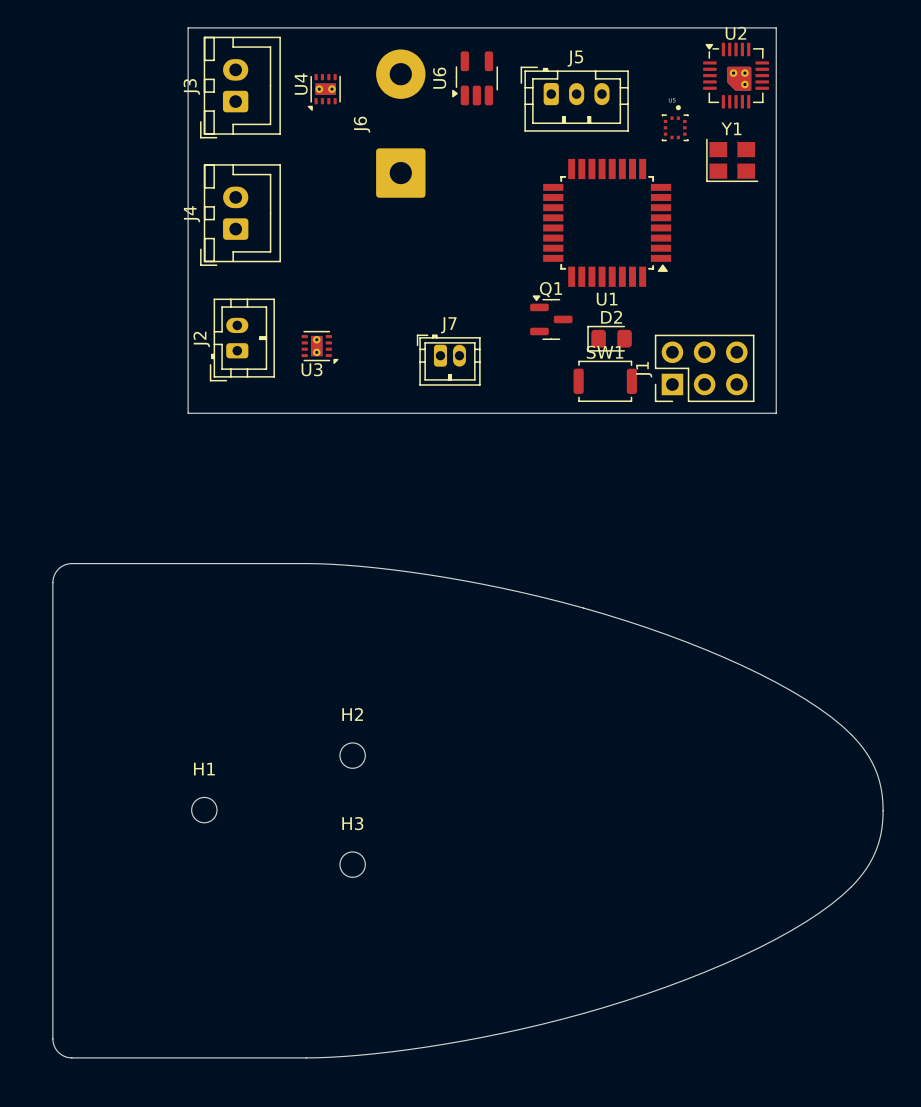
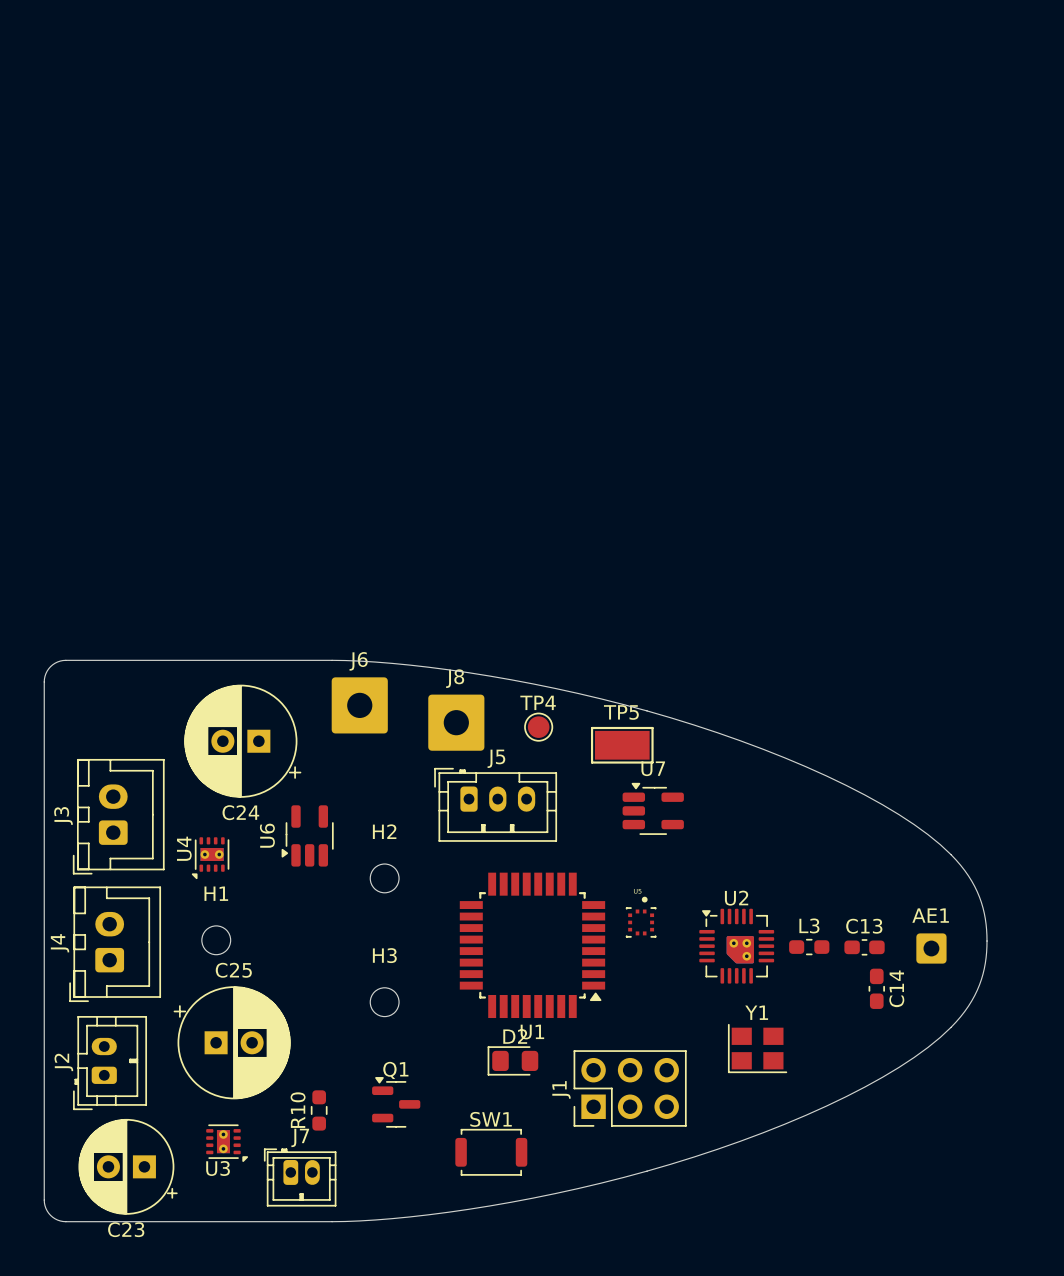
board edge: (188, 27) (776, 27) (776, 413) (188, 413) (188, 27) -> none
J6 footprint: [376, 49, 426, 198] -> [331, 677, 388, 734]
U2 position: (736, 75) -> (736, 946)
U6 position: (475, 78) -> (307, 835)
J3 position: (240, 87) -> (118, 816)
U4 position: (324, 92) -> (210, 858)
J5 position: (574, 99) -> (495, 804)
part position: (675, 123) -> (641, 917)
J6 name position: J6 (362, 124) -> J6 (358, 661)
Y1 position: (732, 160) -> (757, 1048)
J4 position: (240, 215) -> (115, 944)
U1 position: (607, 222) -> (532, 945)
Q1 position: (551, 317) -> (396, 1102)
D2 position: (609, 338) -> (512, 1060)
J2 position: (242, 339) -> (110, 1063)
U3 position: (320, 347) -> (227, 1143)
J7 position: (448, 360) -> (300, 1177)
J1 position: (704, 368) -> (630, 1088)
SW1 position: (605, 381) -> (491, 1152)
J8: none -> (456, 722)
TP4: none -> (538, 727)
C24: none -> (242, 741)
TP5: none -> (622, 745)
U7: none -> (653, 808)
L3: none -> (809, 947)
C13: none -> (864, 947)
AE1: none -> (931, 948)
C14: none -> (876, 988)
C25: none -> (232, 1042)
R10: none -> (319, 1110)
C23: none -> (128, 1166)

